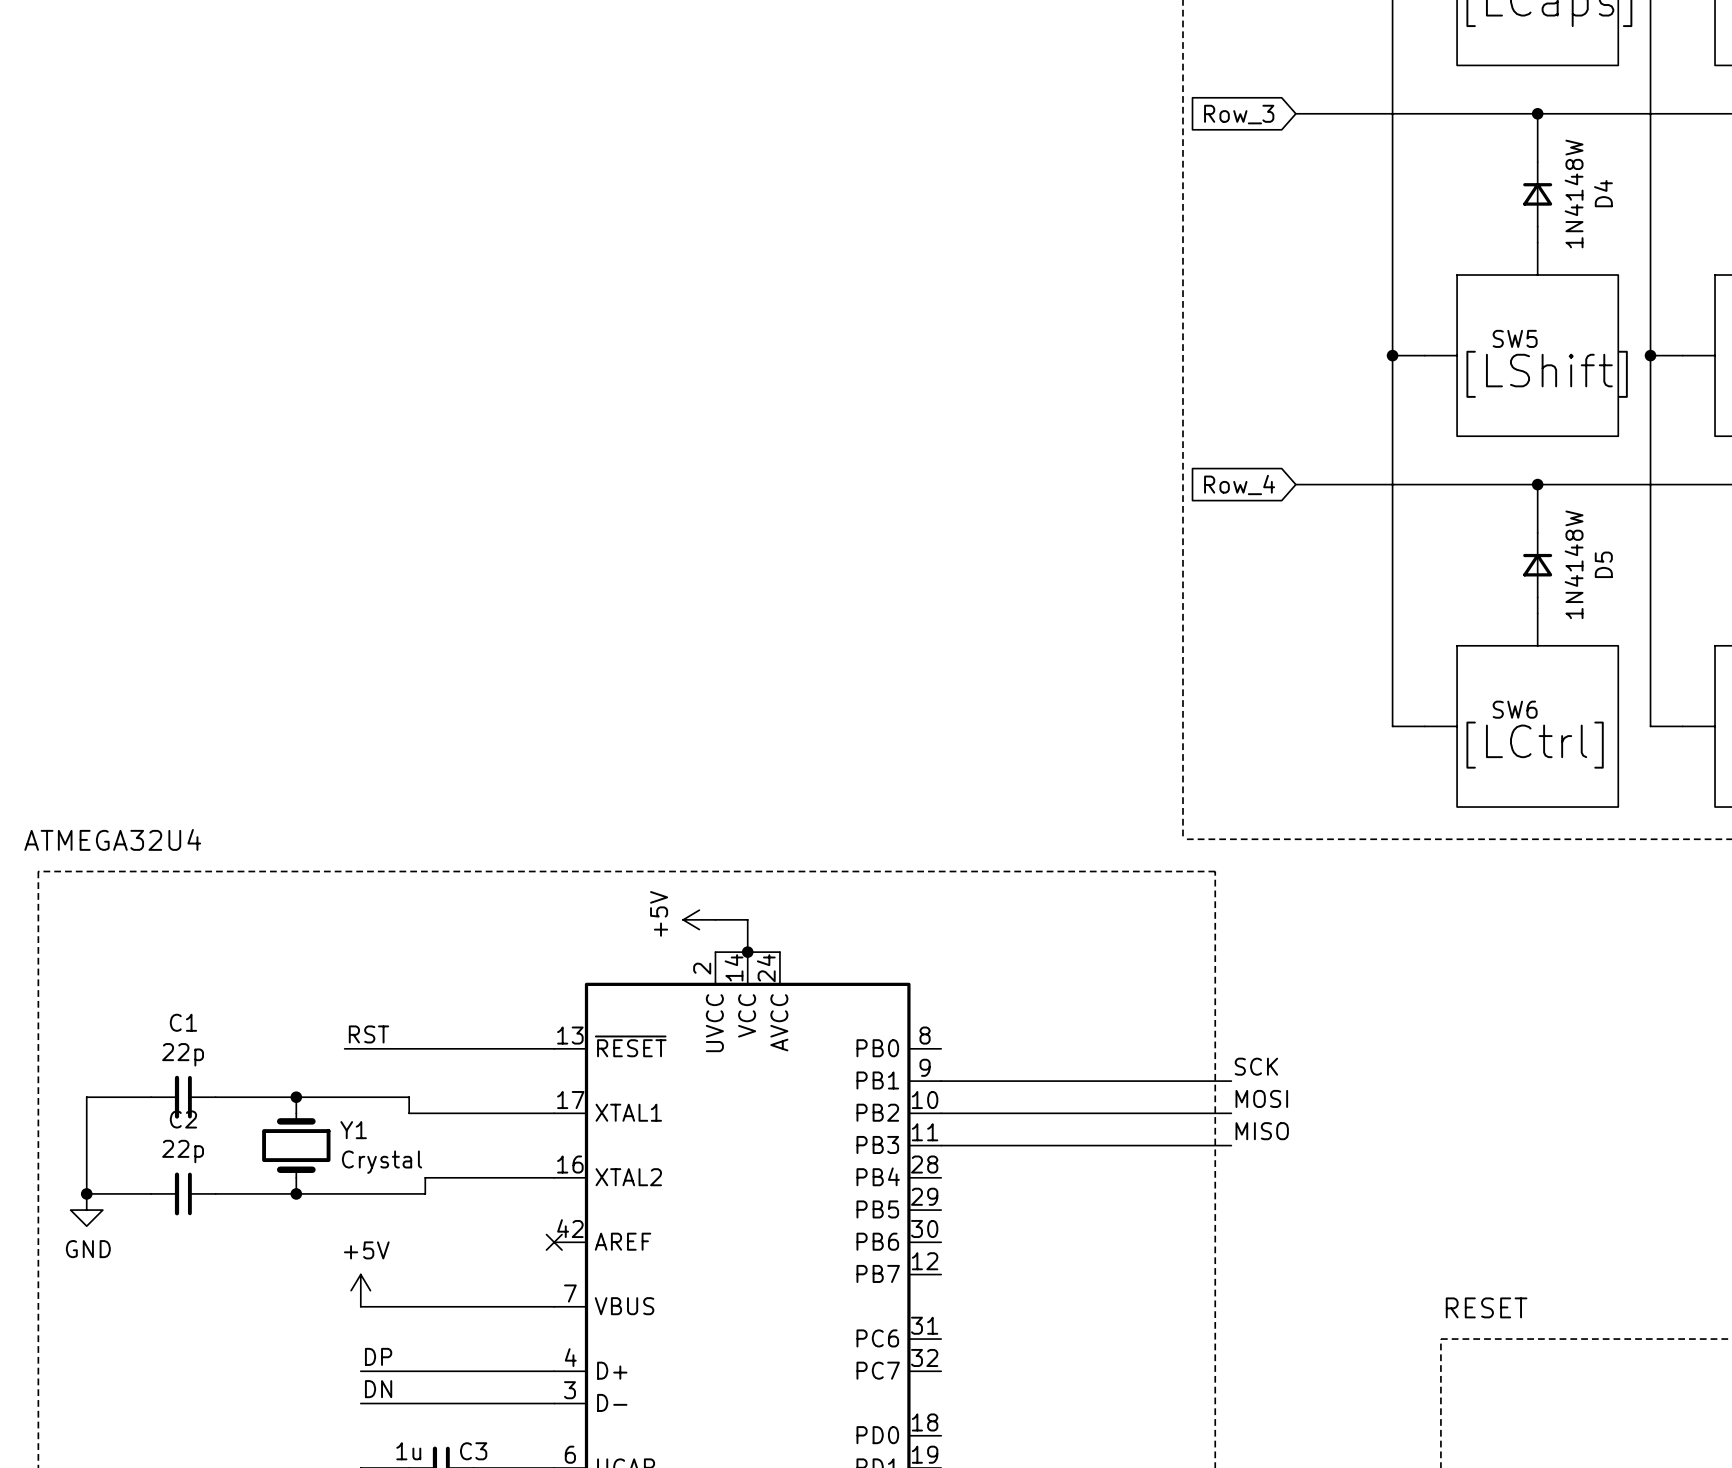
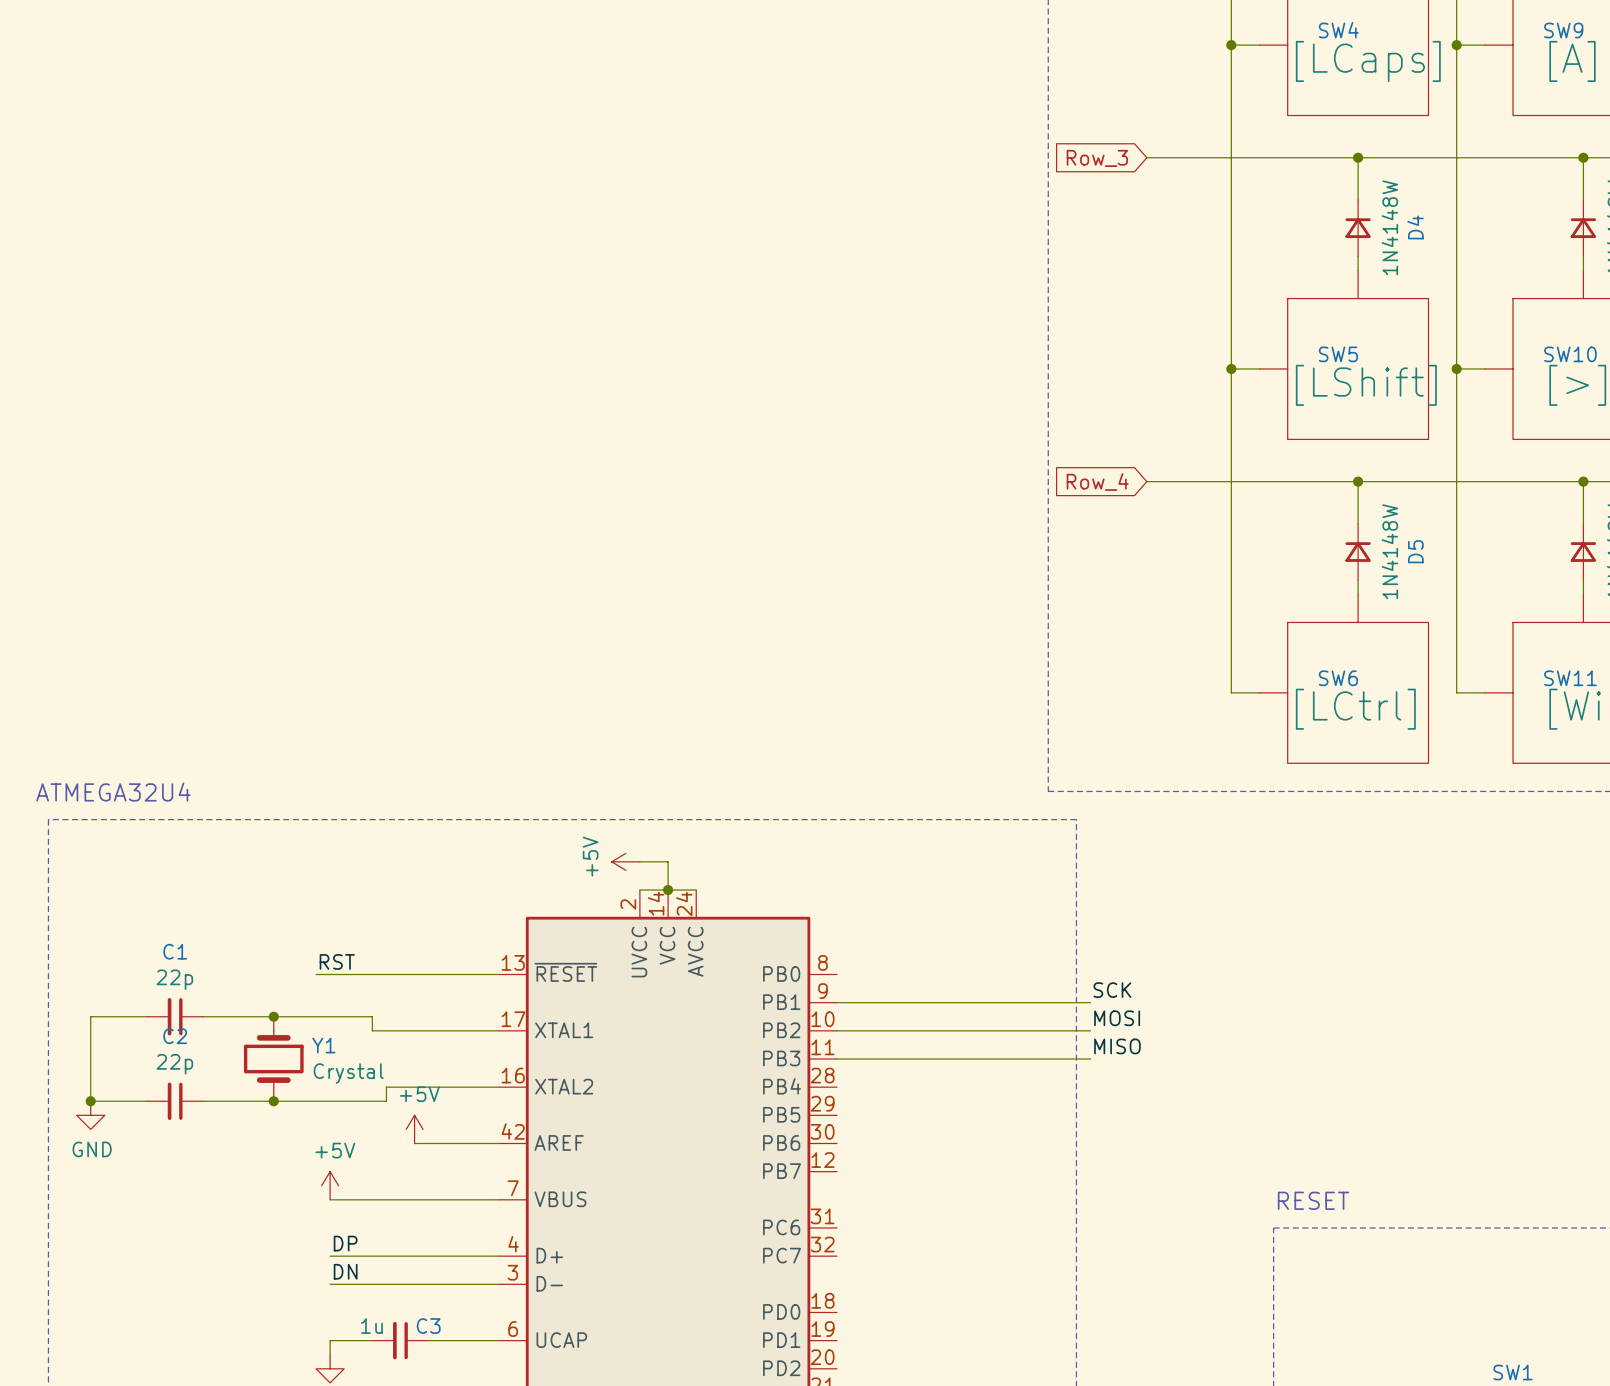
power symbol: none -> +5V (414, 1129)
wire: none -> (414, 1143) (499, 1143)
no-connect mark: (554, 1242) -> none

